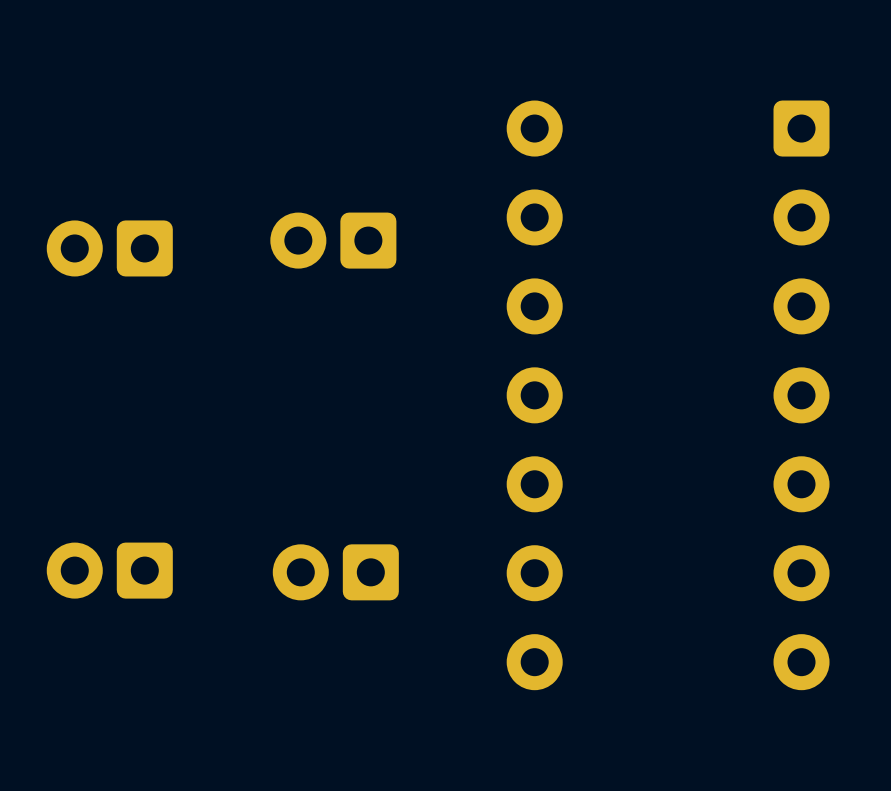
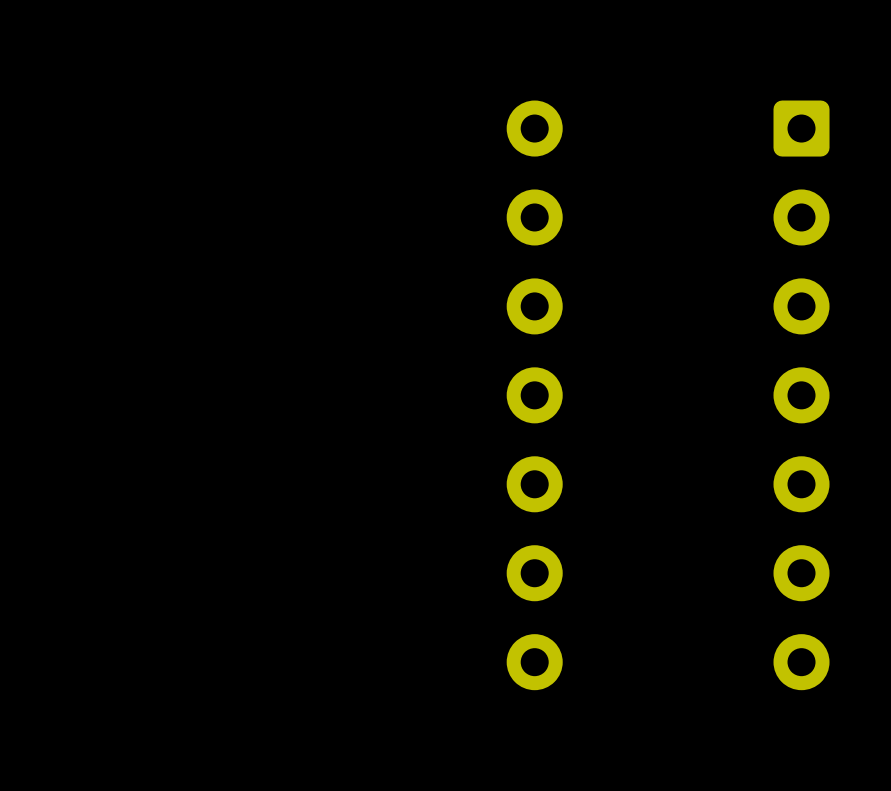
part: (333, 240) -> none
part: (109, 248) -> none
part: (109, 570) -> none
part: (335, 572) -> none

